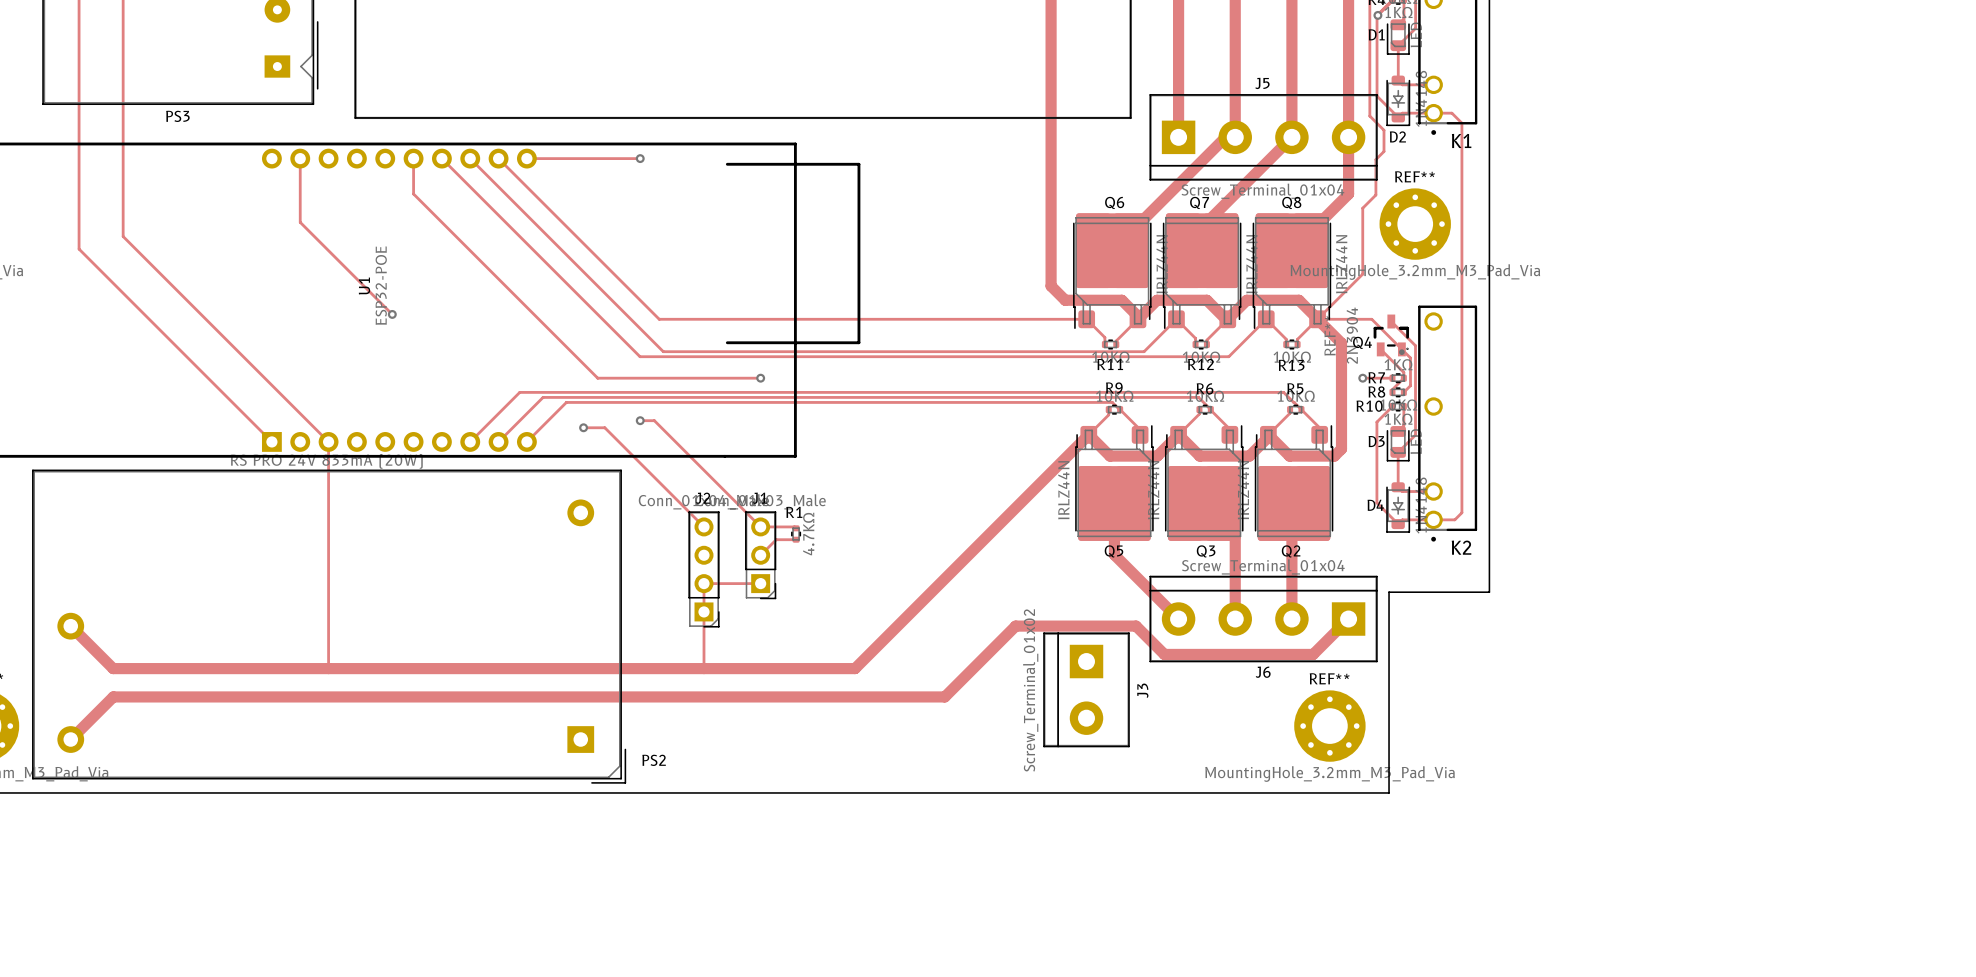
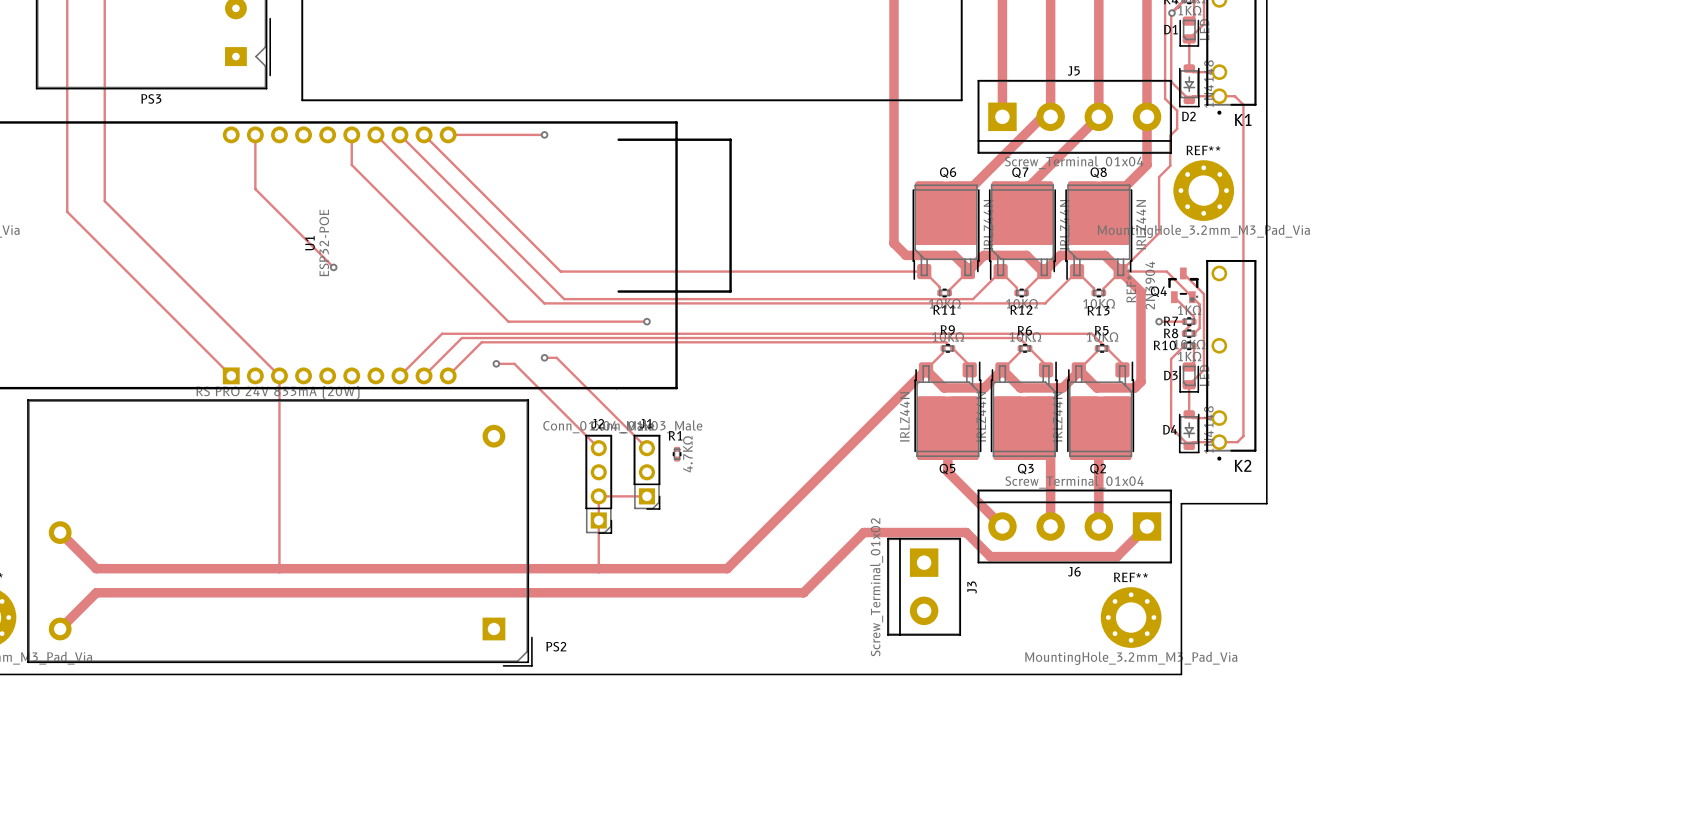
track: (760, 526) (796, 528) -> none
track: (796, 539) (776, 539) (760, 555) -> none

